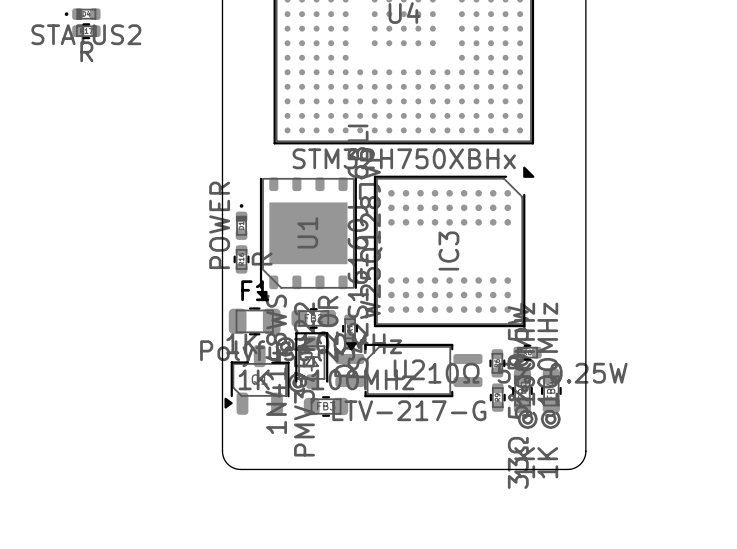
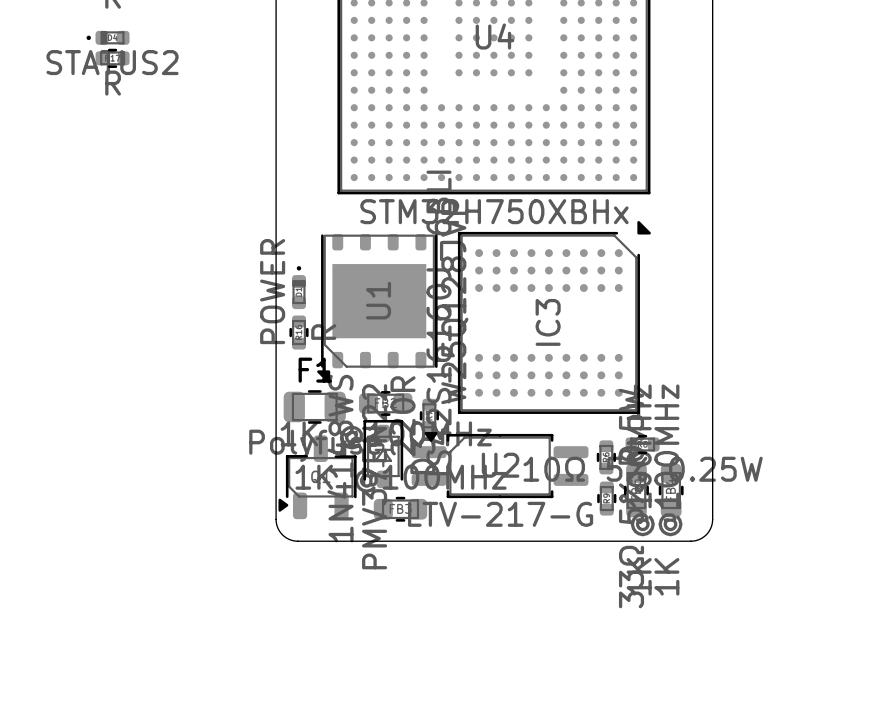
board edge: (222, 414) (223, 457) (229, 465) (240, 469) (569, 469) (579, 465) (584, 457) (585, 414) -> (276, 519) (278, 528) (282, 534) (288, 539) (297, 541) (690, 541) (698, 540) (706, 534) (710, 528) (712, 519)

